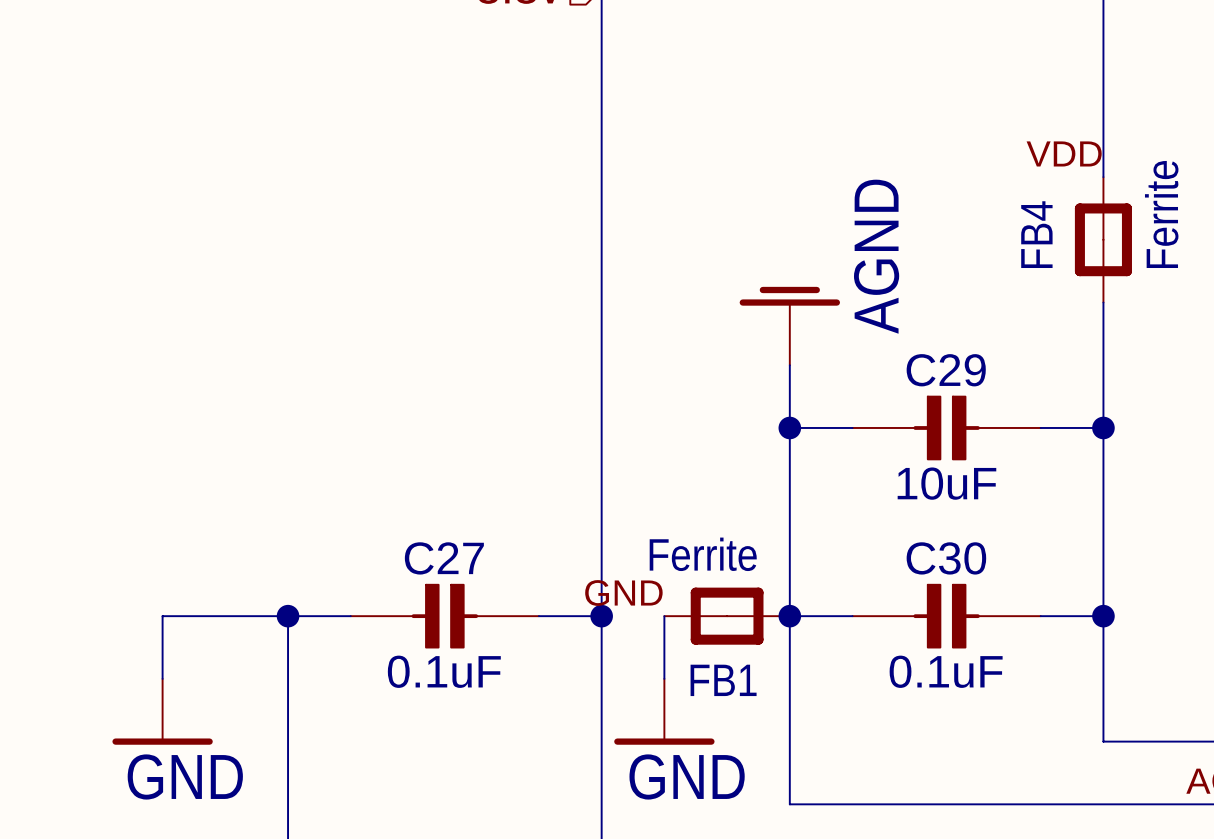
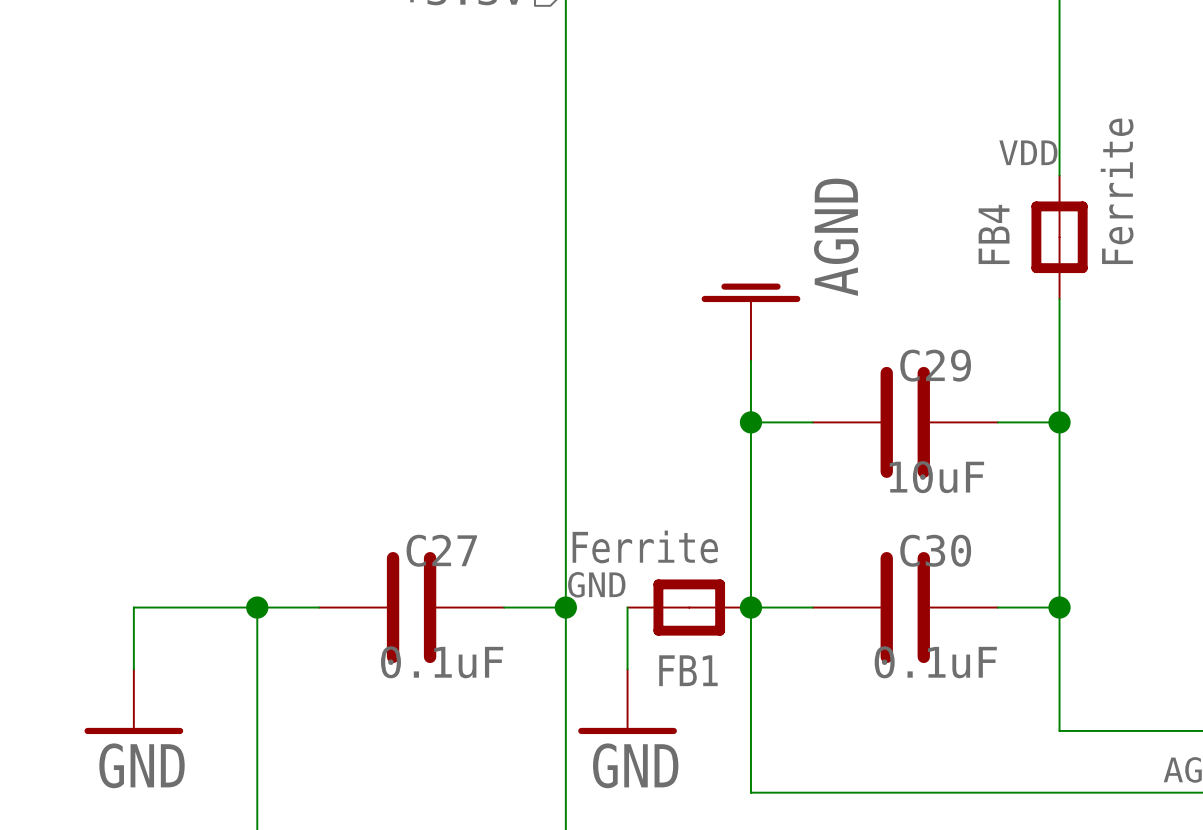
C29 name position: C29 (946, 370) -> C29 (935, 365)
C29 symbol: [852, 396, 1041, 460] -> [812, 366, 998, 478]
C29 value position: 10uF (946, 483) -> 10uF (936, 477)
C27 name position: C27 (444, 558) -> C27 (441, 550)
C30 name position: C30 (946, 558) -> C30 (935, 550)
C27 symbol: [350, 584, 539, 648] -> [318, 552, 505, 664]
C30 symbol: [852, 584, 1041, 648] -> [812, 552, 998, 664]
C27 value position: 0.1uF (444, 671) -> 0.1uF (442, 662)
C30 value position: 0.1uF (946, 671) -> 0.1uF (935, 662)

